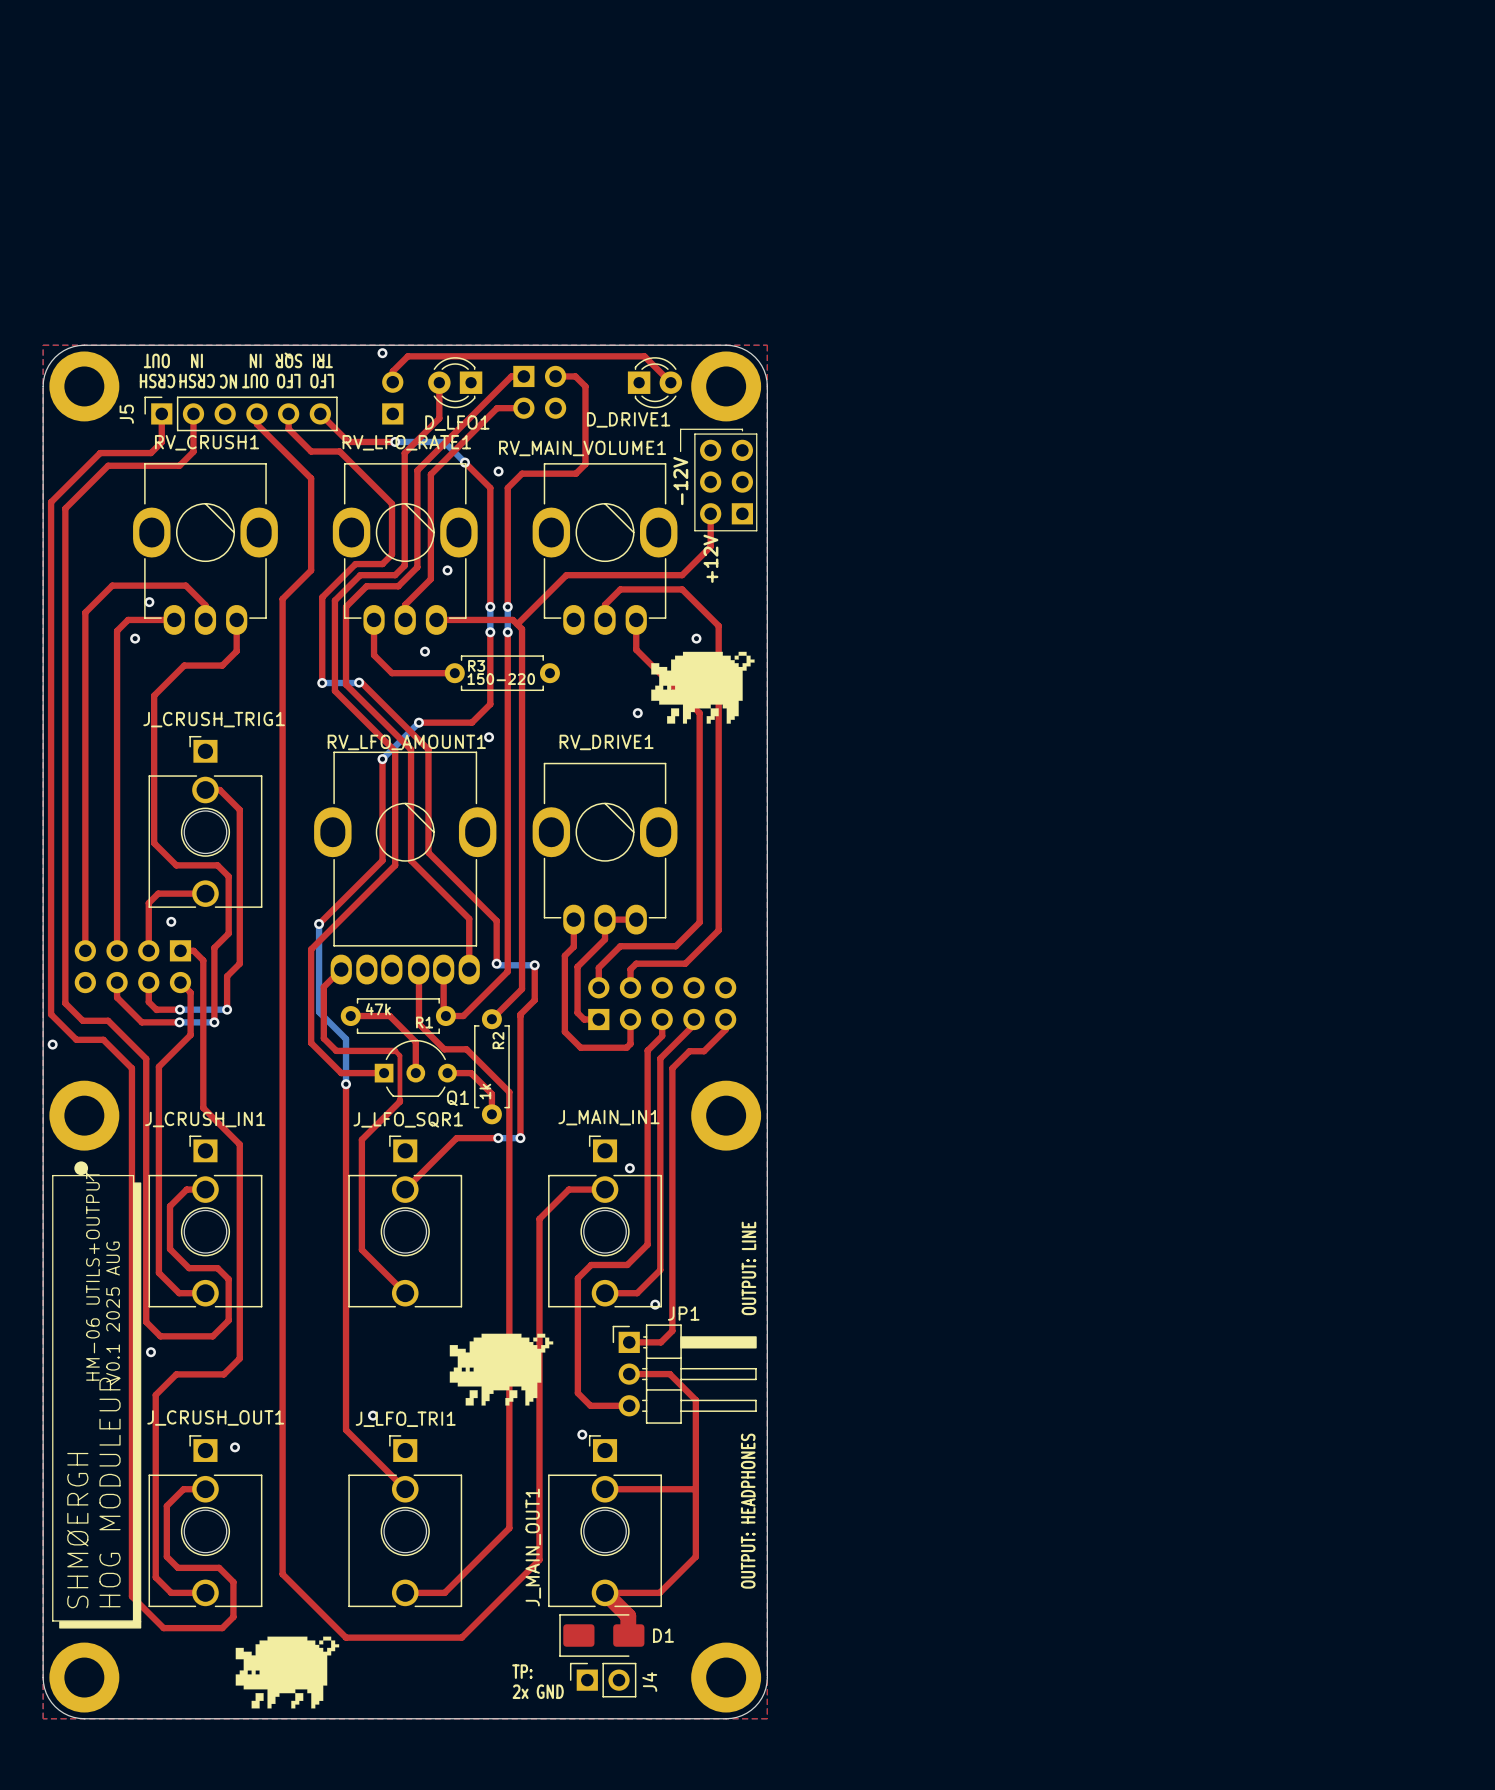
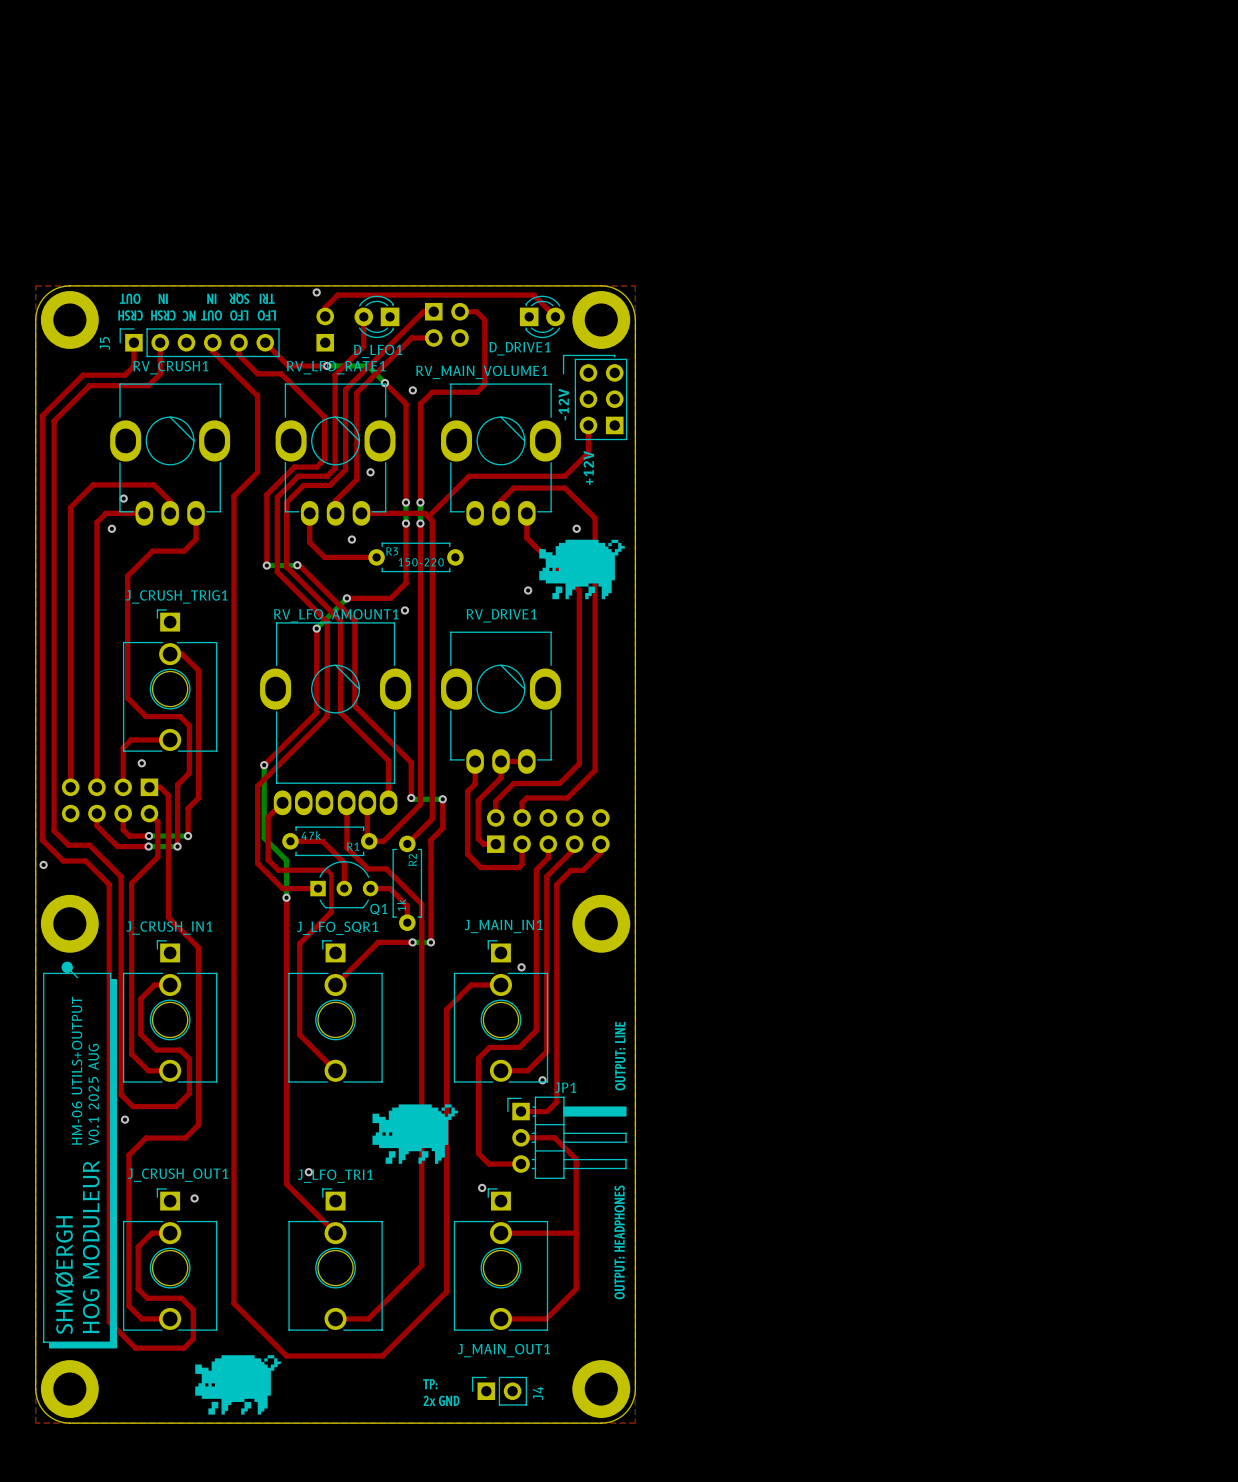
J_MAIN_OUT1 name rotation: 0° (533, 1547) -> 90° clockwise (503, 1350)
top track: (605, 1592) (628, 1616) (628, 1635) -> none
D1: (601, 1635) -> none

